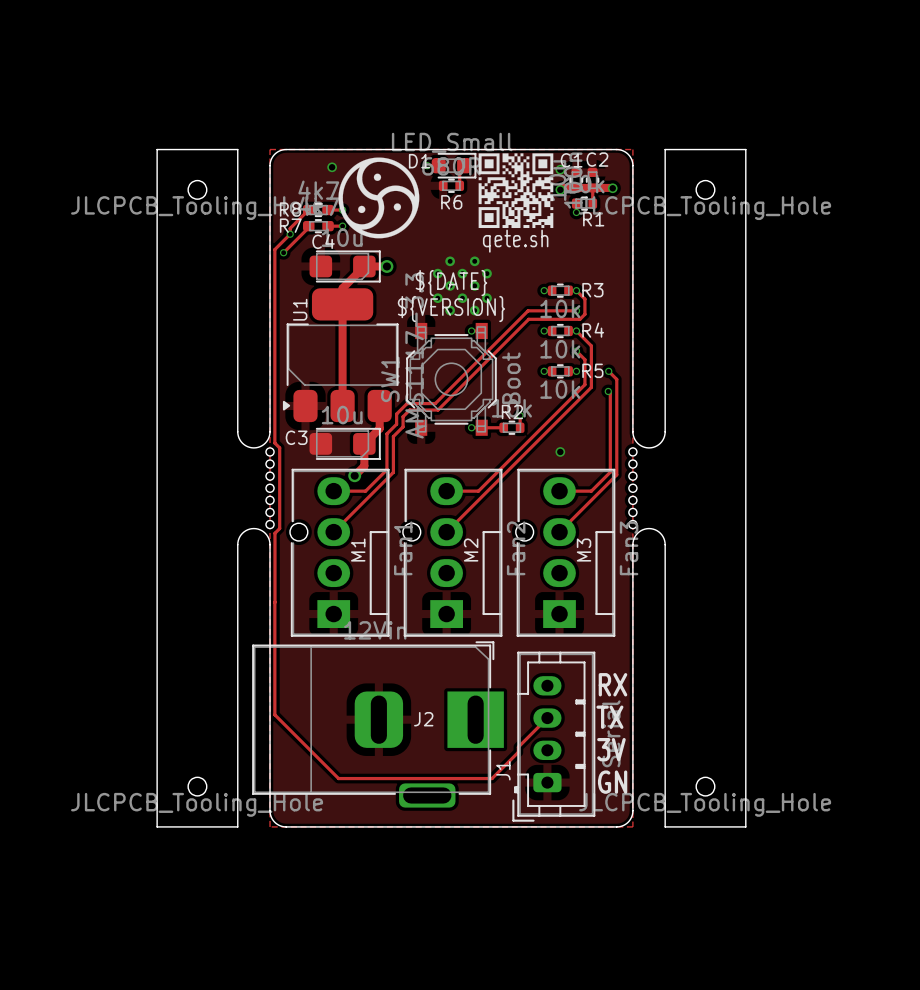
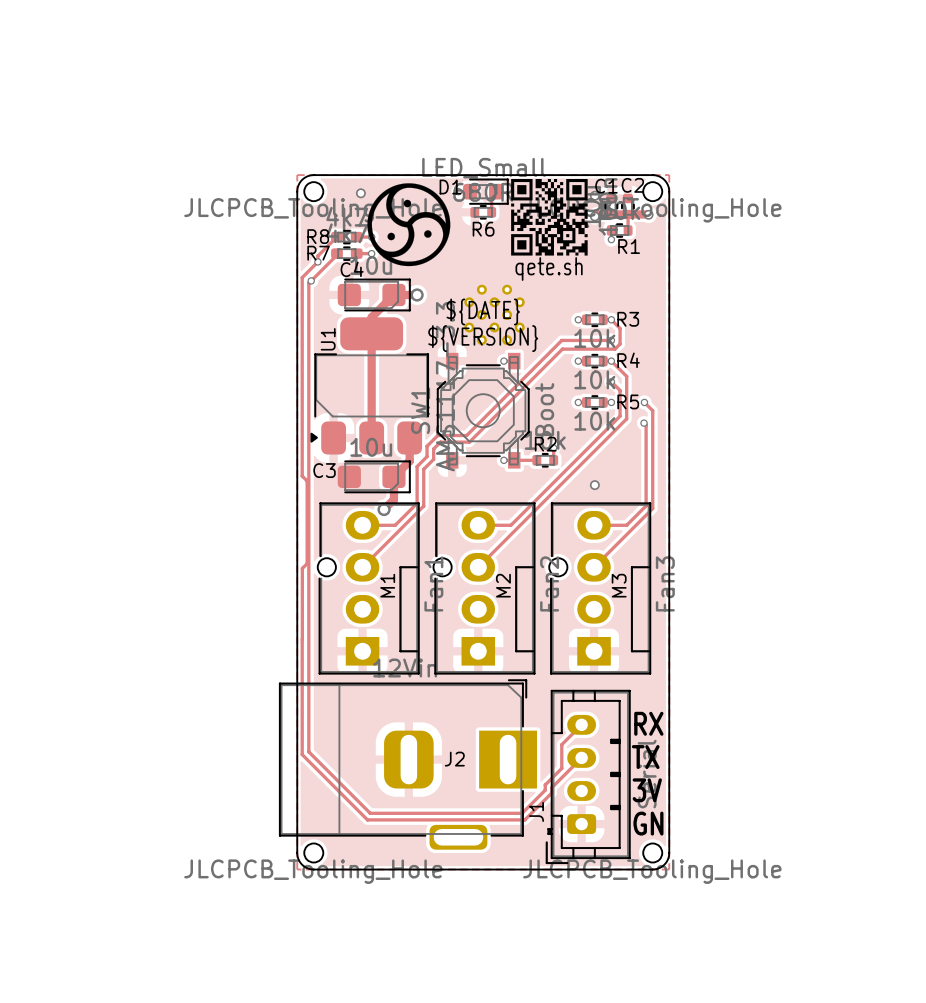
part position: (197, 189) -> (313, 191)
part position: (705, 189) -> (652, 191)
track: none -> (311, 280) (308, 283) (308, 751) (370, 813) (522, 813) (545, 790) (545, 784) (561, 768) (561, 744) (581, 724)
board edge: (237, 431) (237, 149) (157, 149) (157, 826) (237, 826) (237, 544) -> none
board edge: none -> (297, 464) (297, 580)
board edge: none -> (669, 464) (669, 580)
board edge: (665, 431) (665, 149) (745, 149) (745, 826) (665, 826) (665, 544) -> none
part: (255, 488) -> none
part: (647, 488) -> none
part position: (197, 786) -> (313, 852)
part position: (705, 786) -> (652, 852)

